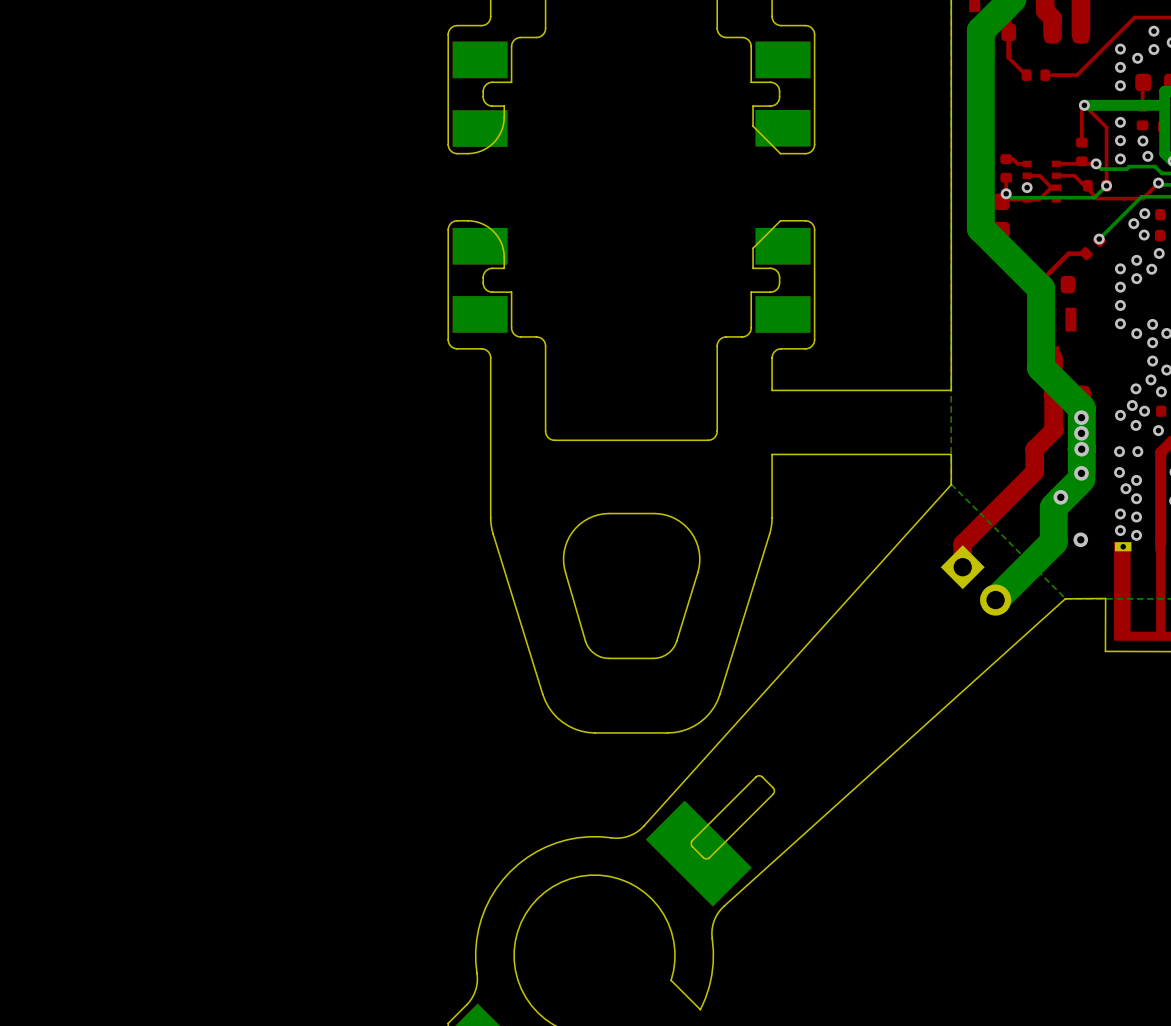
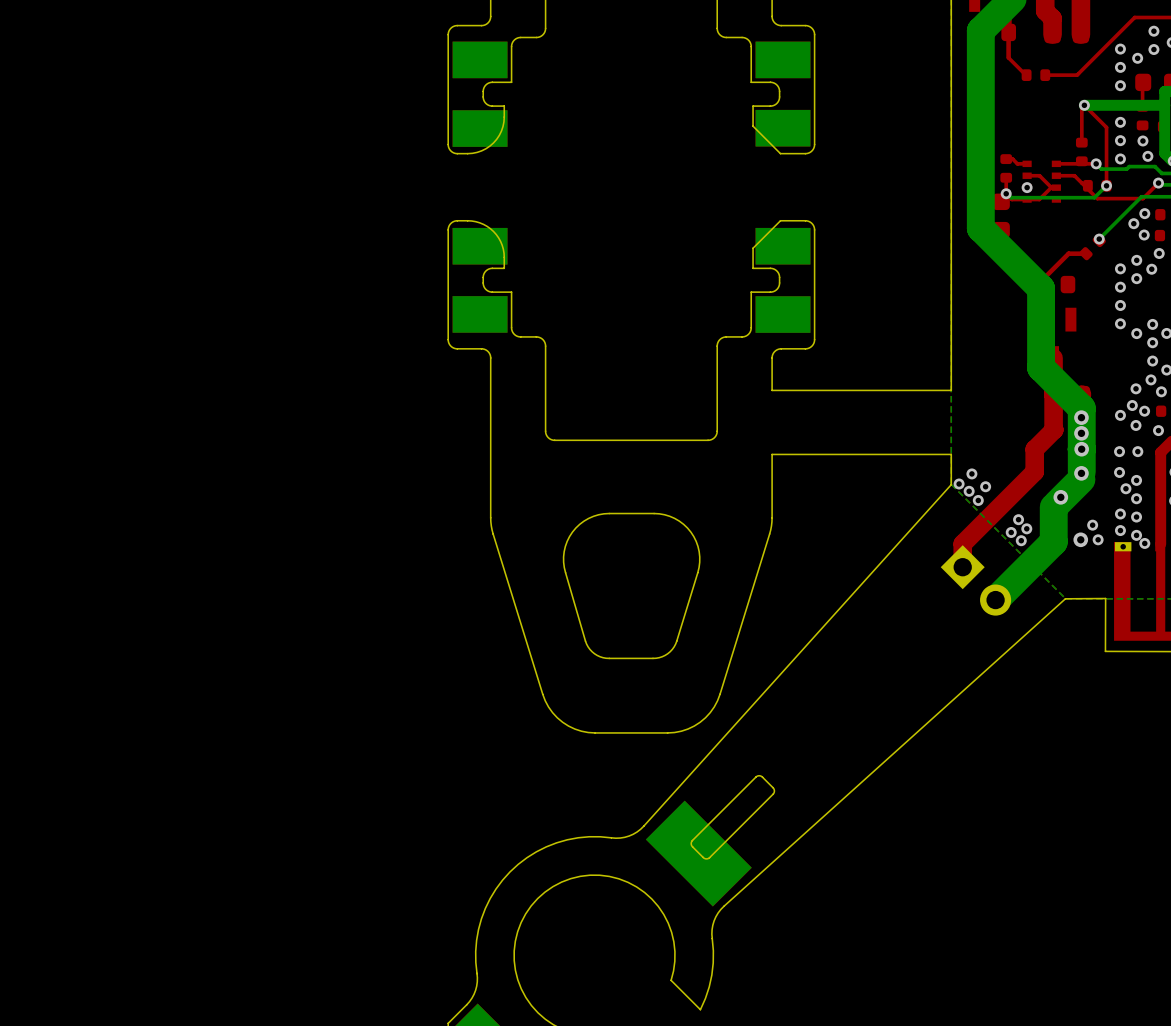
via: none -> (971, 473)
via: none -> (959, 484)
via: none -> (985, 486)
via: none -> (969, 491)
via: none -> (978, 500)
via: none -> (1018, 519)
via: none -> (1092, 525)
via: none -> (1026, 528)
via: none -> (1011, 532)
via: none -> (1098, 539)
via: none -> (1021, 540)
via: none -> (1144, 543)

